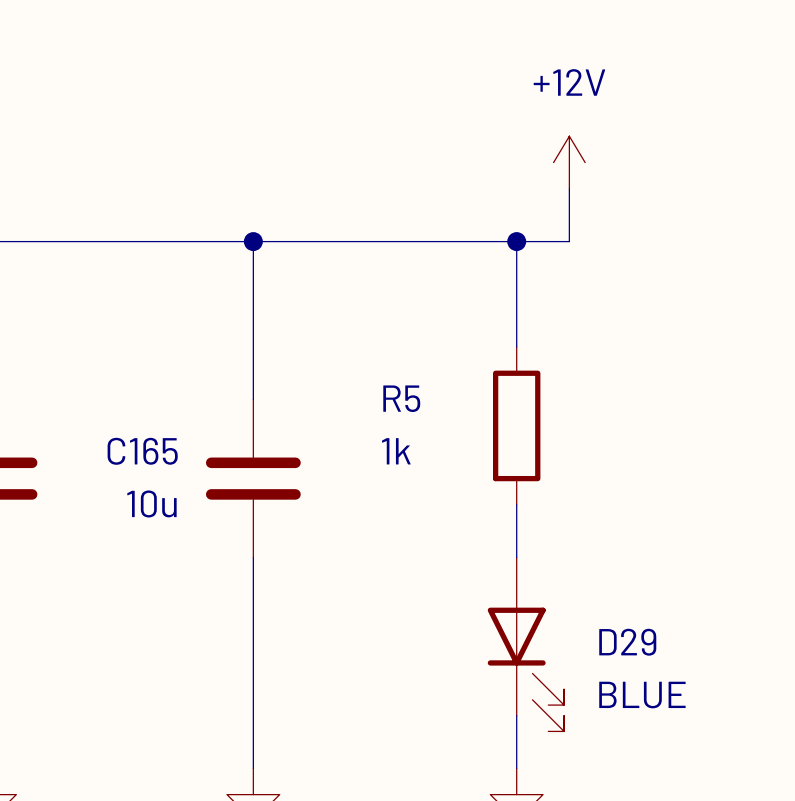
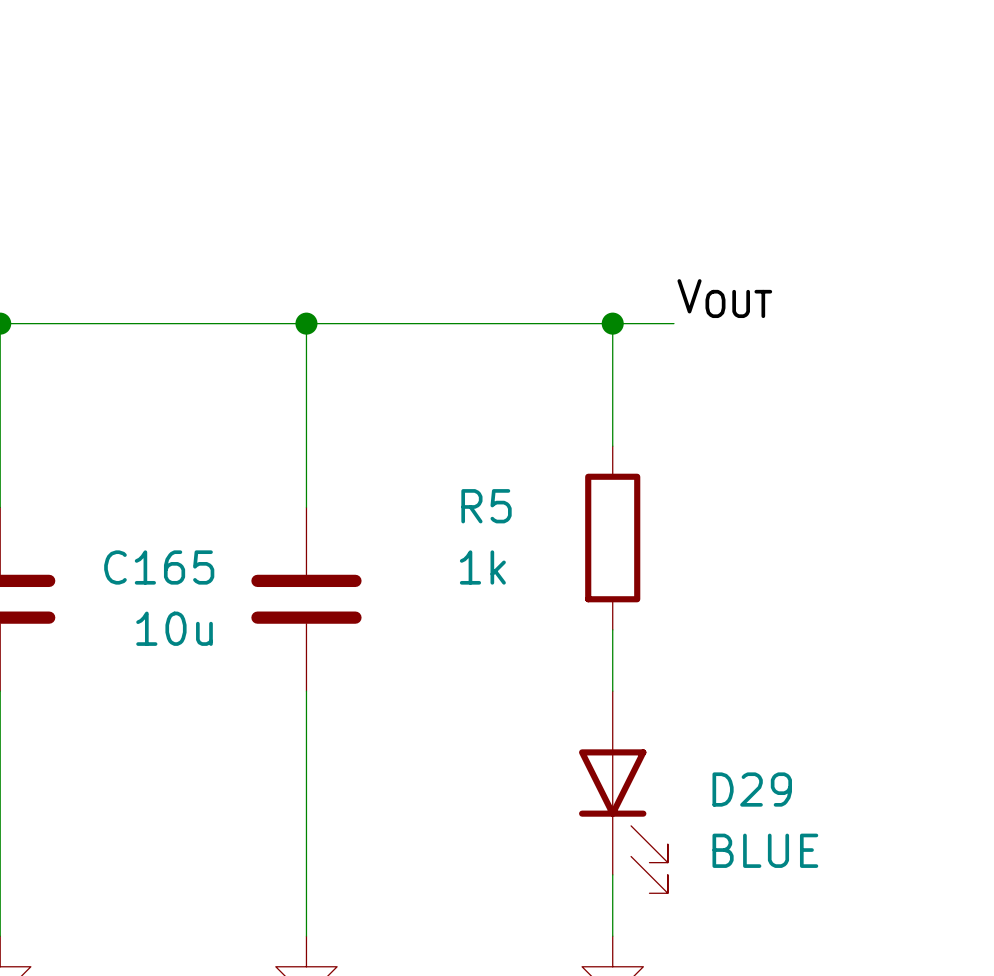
power symbol: +12V (569, 162) -> none
wire: (569, 188) (569, 241) -> none
label: none -> VOUT (724, 298)

